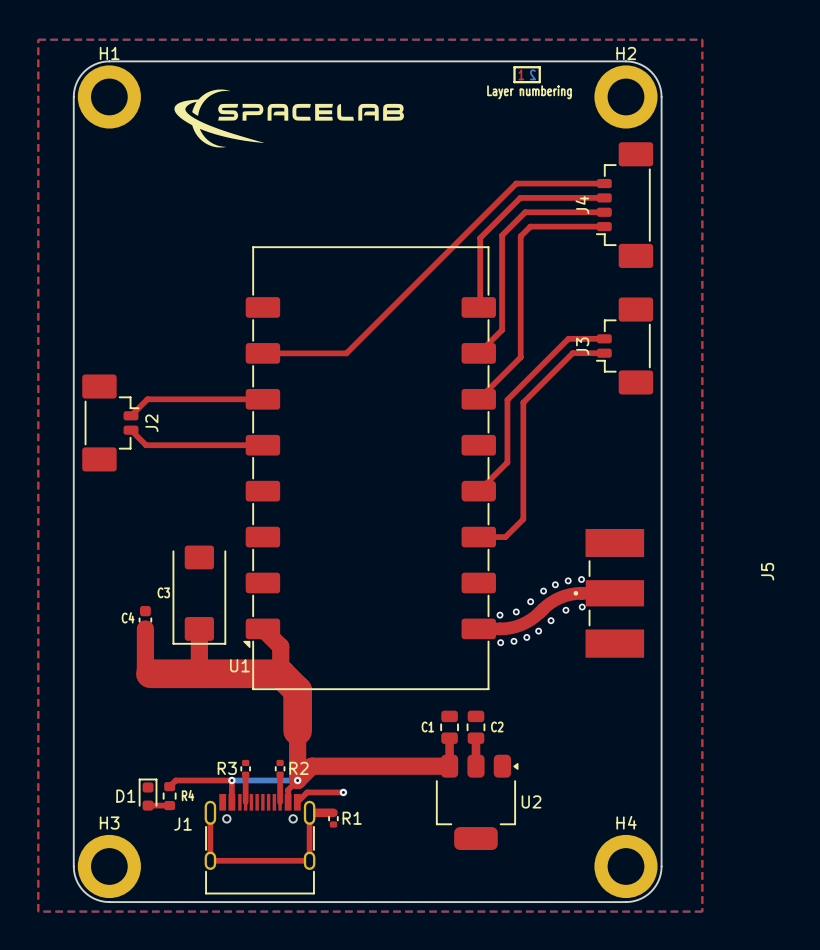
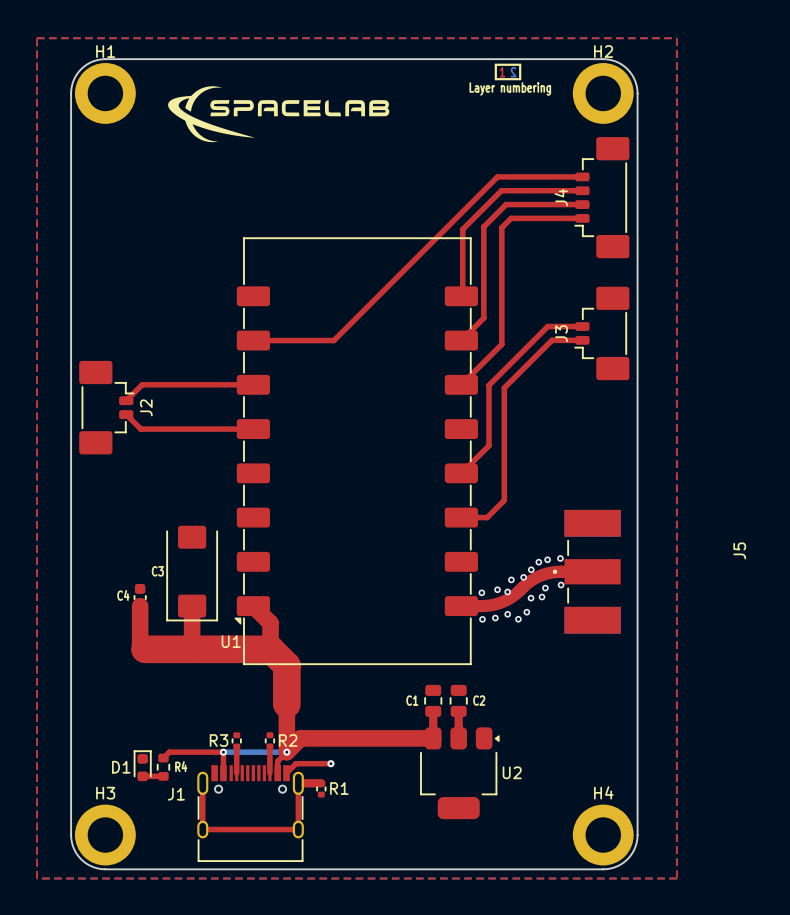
via: none -> (538, 562)
via: (555, 584) -> none
via: (543, 591) -> none
via: none -> (531, 569)
via: none -> (523, 577)
via: none -> (507, 591)
via: none -> (542, 597)
via: (538, 631) -> none
via: none -> (526, 612)
via: none -> (518, 619)

